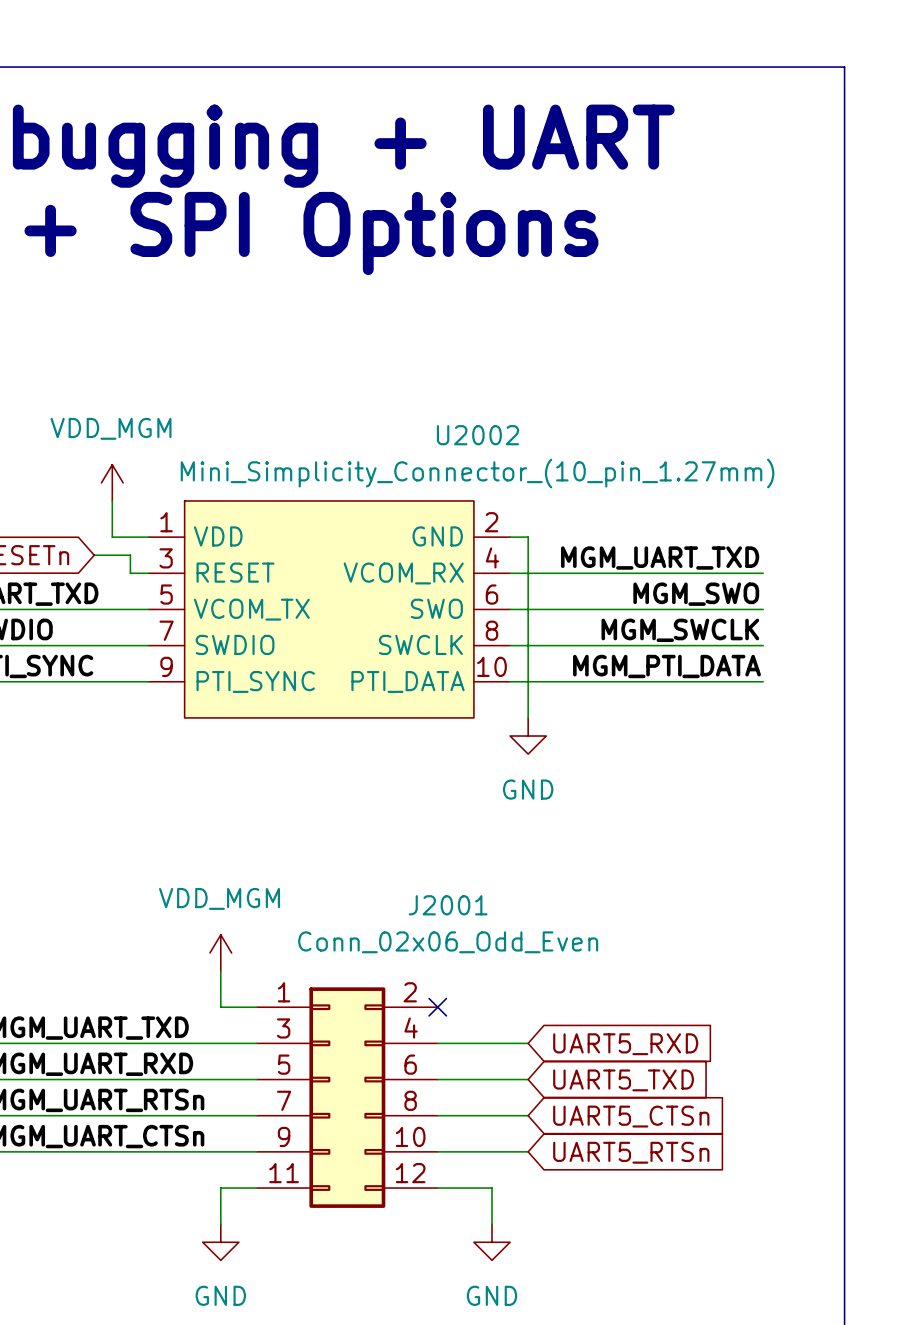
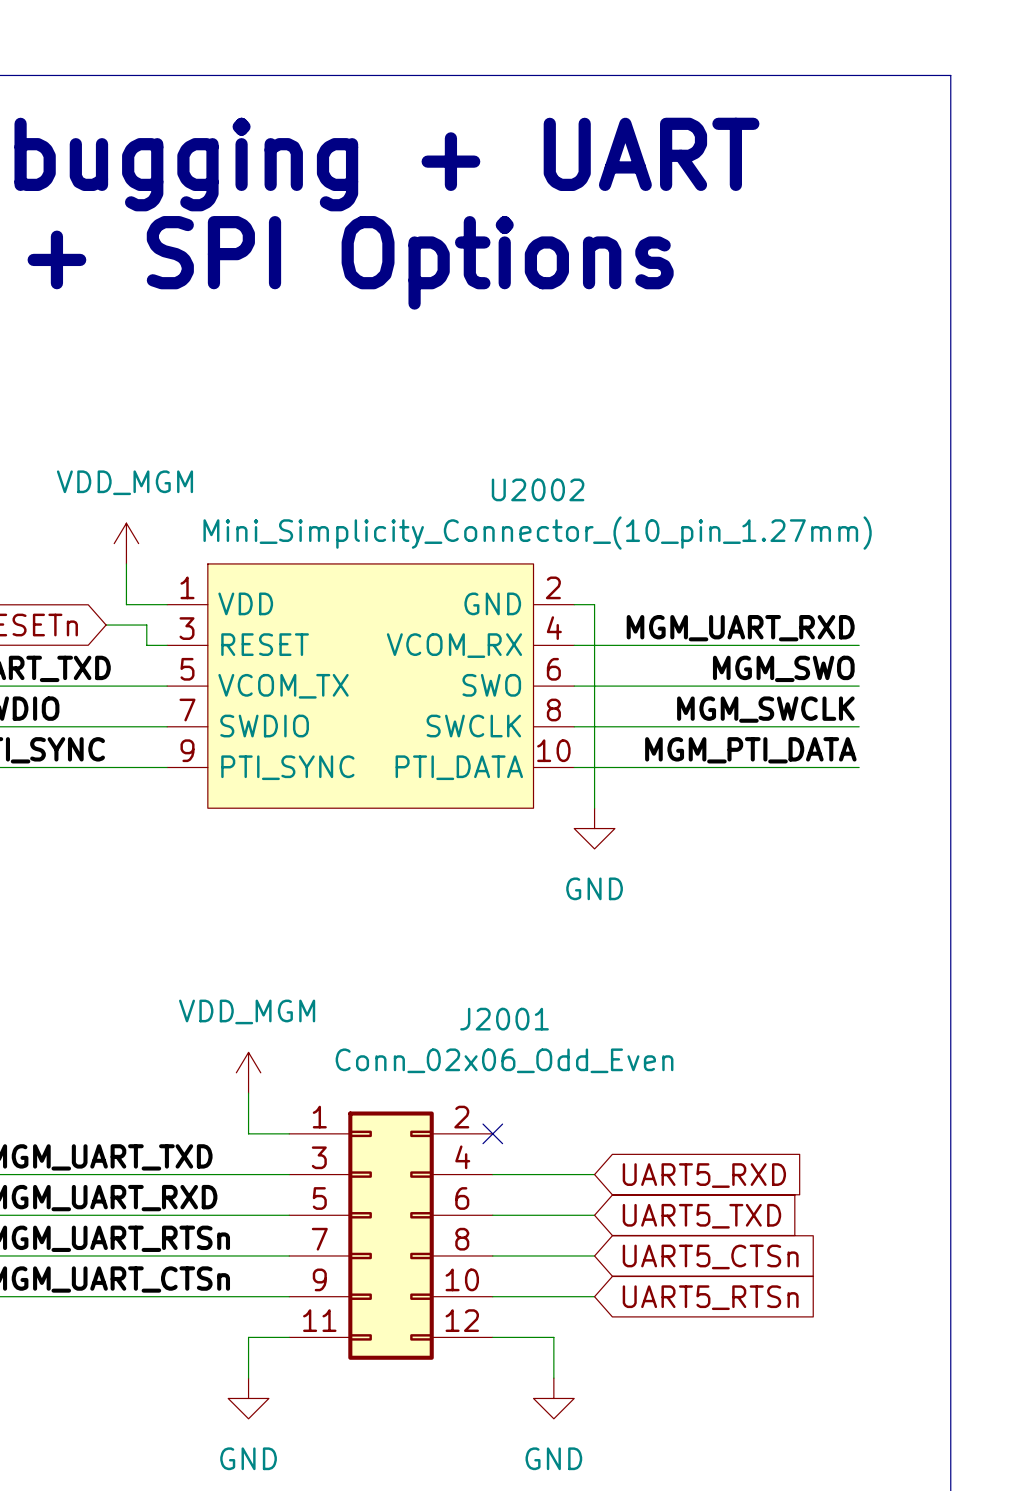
label: MGM_UART_TXD (660, 558) -> MGM_UART_RXD (740, 628)

